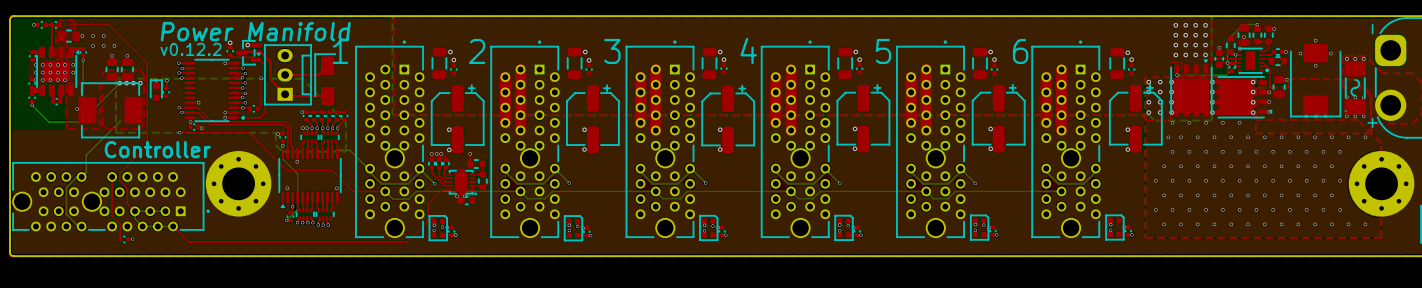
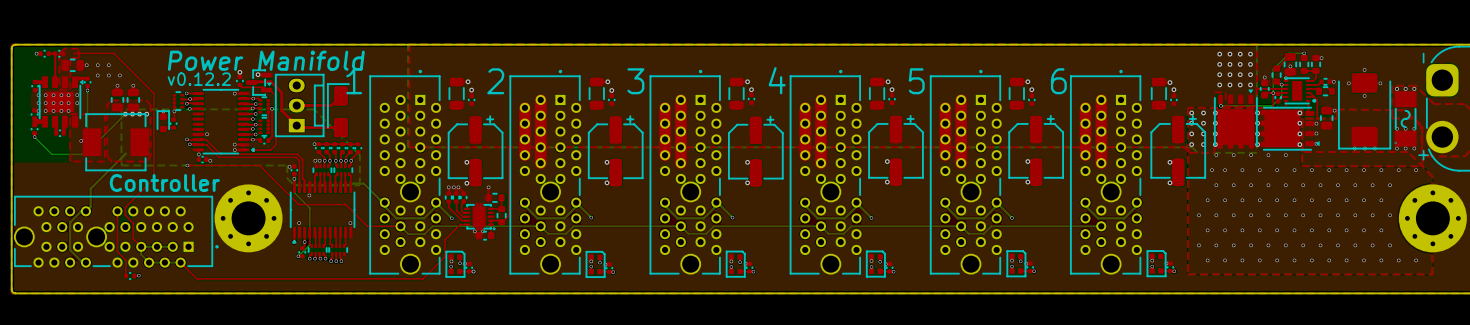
top track: none -> (174, 95) (174, 111)
top track: none -> (182, 99) (190, 99)
top track: none -> (253, 98) (260, 100)
top track: none -> (268, 100) (268, 132)
part: none -> (178, 101)
part: none -> (264, 106)
top track: none -> (252, 108) (260, 108)
part: none -> (264, 126)

